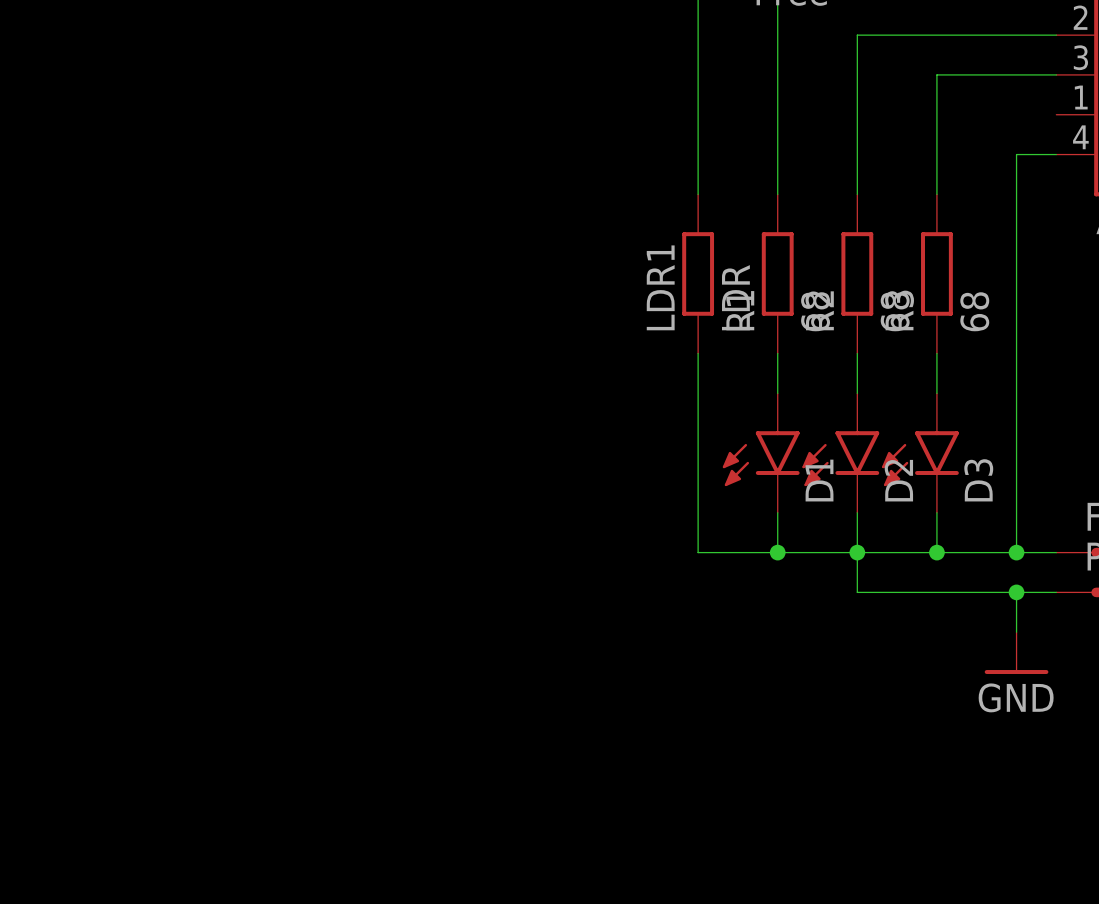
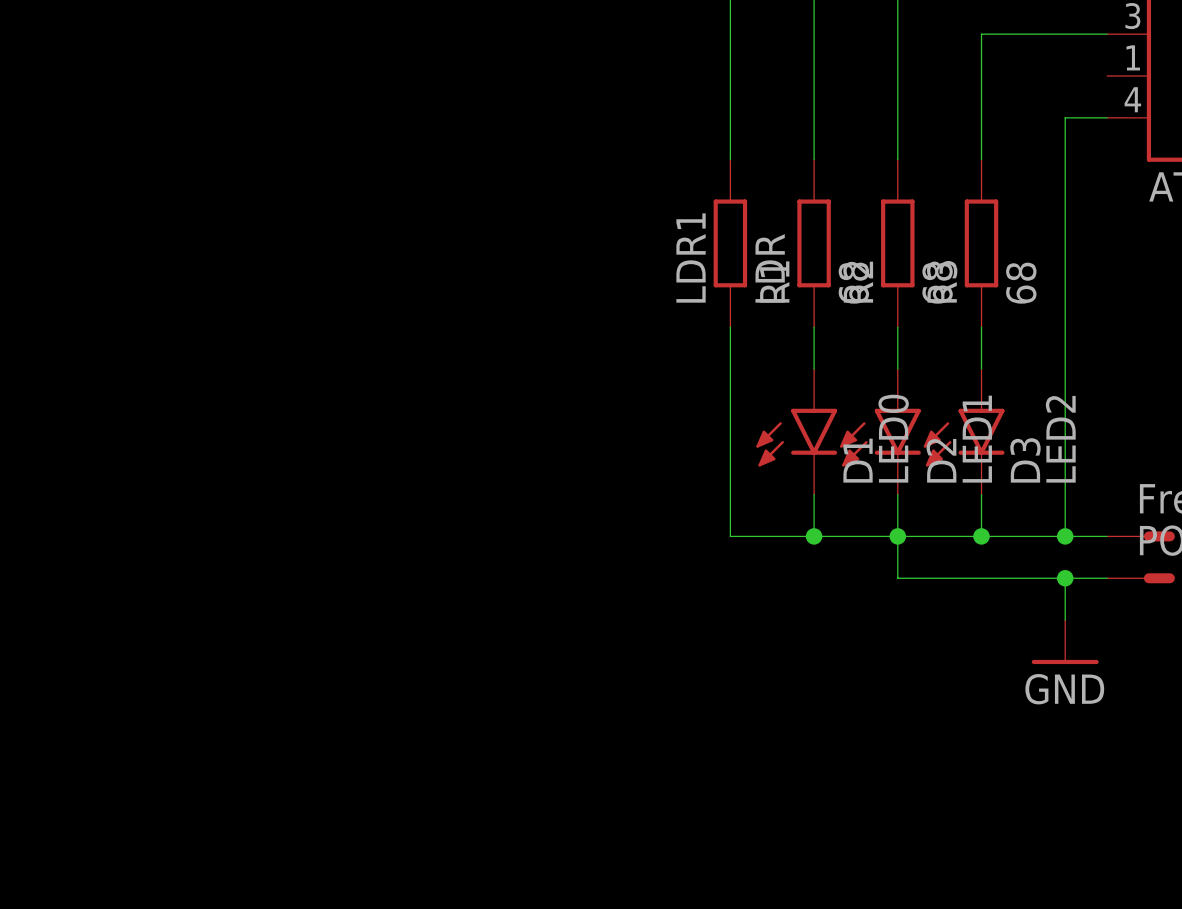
D1 value: none -> LED0 (893, 438)
D2 value: none -> LED1 (977, 439)
D3 value: none -> LED2 (1060, 439)

